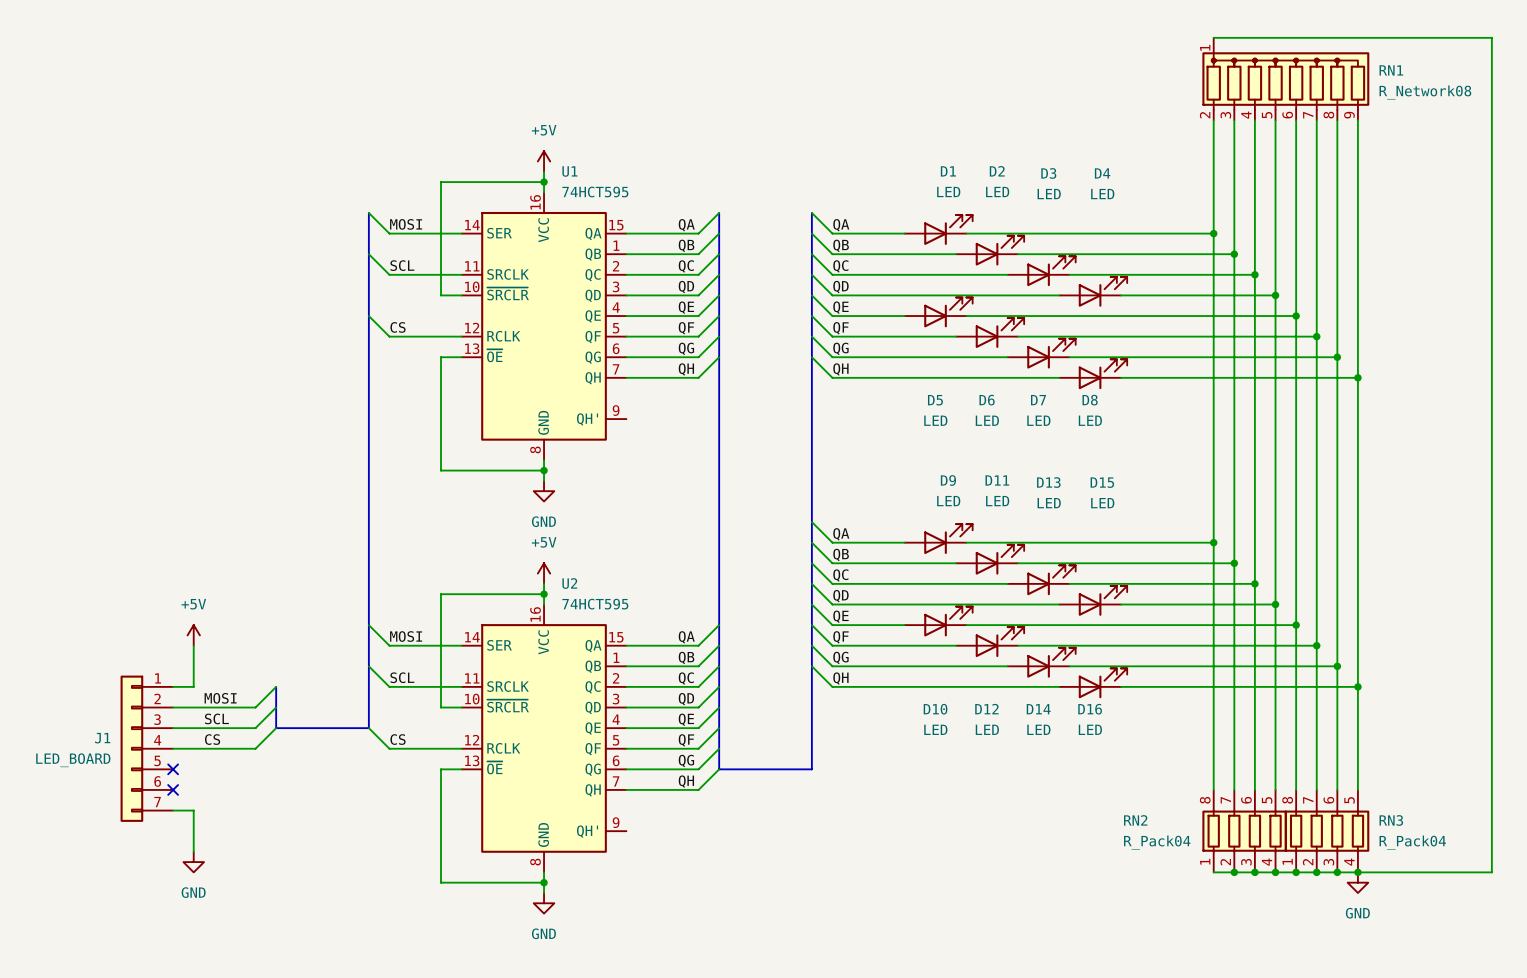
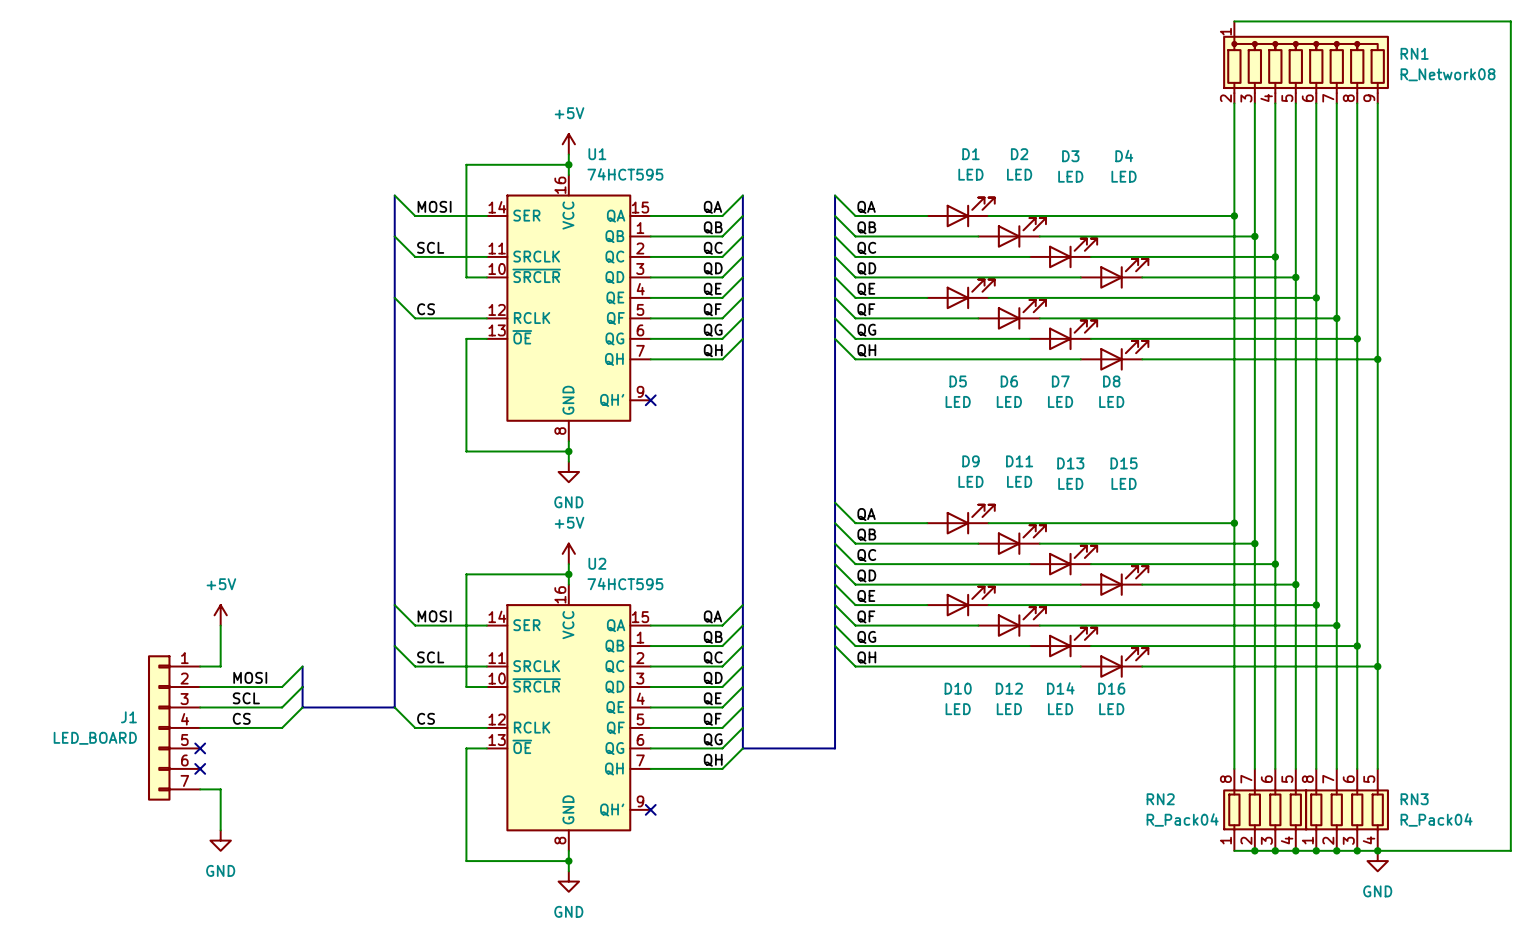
no-connect mark: none -> (650, 400)
no-connect mark: none -> (650, 809)

